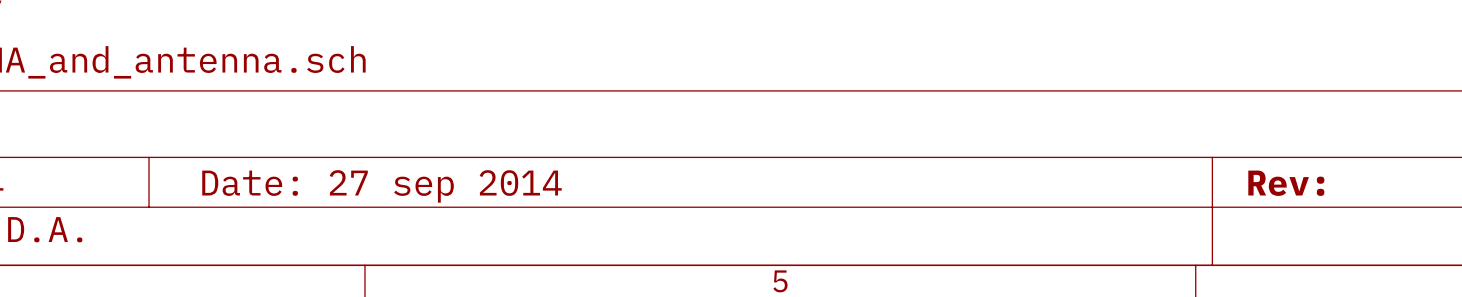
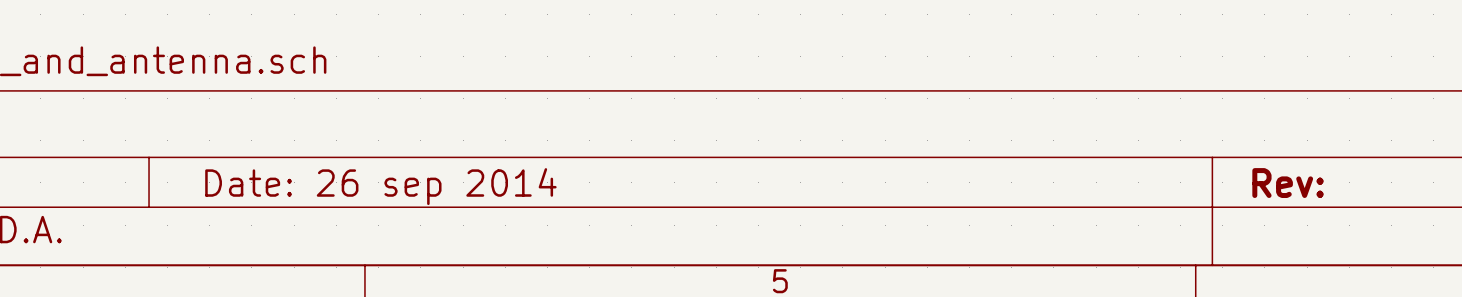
title block: Date: 27 sep 2014 (381, 186) -> Date: 26 sep 2014 (380, 186)

